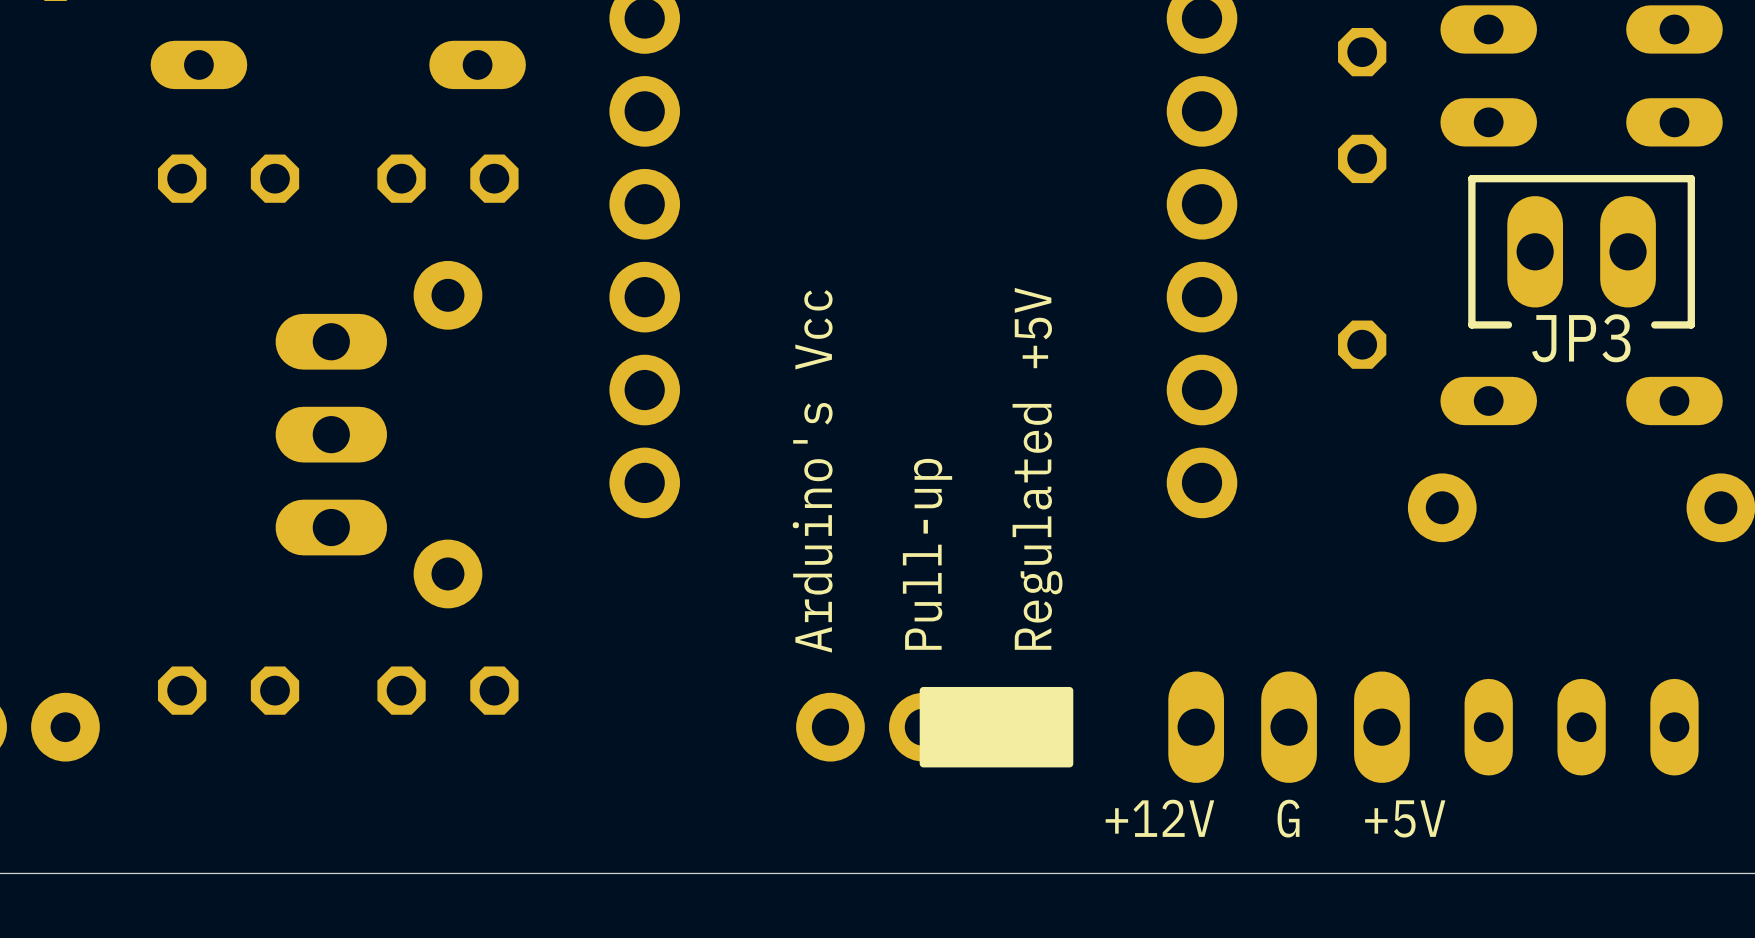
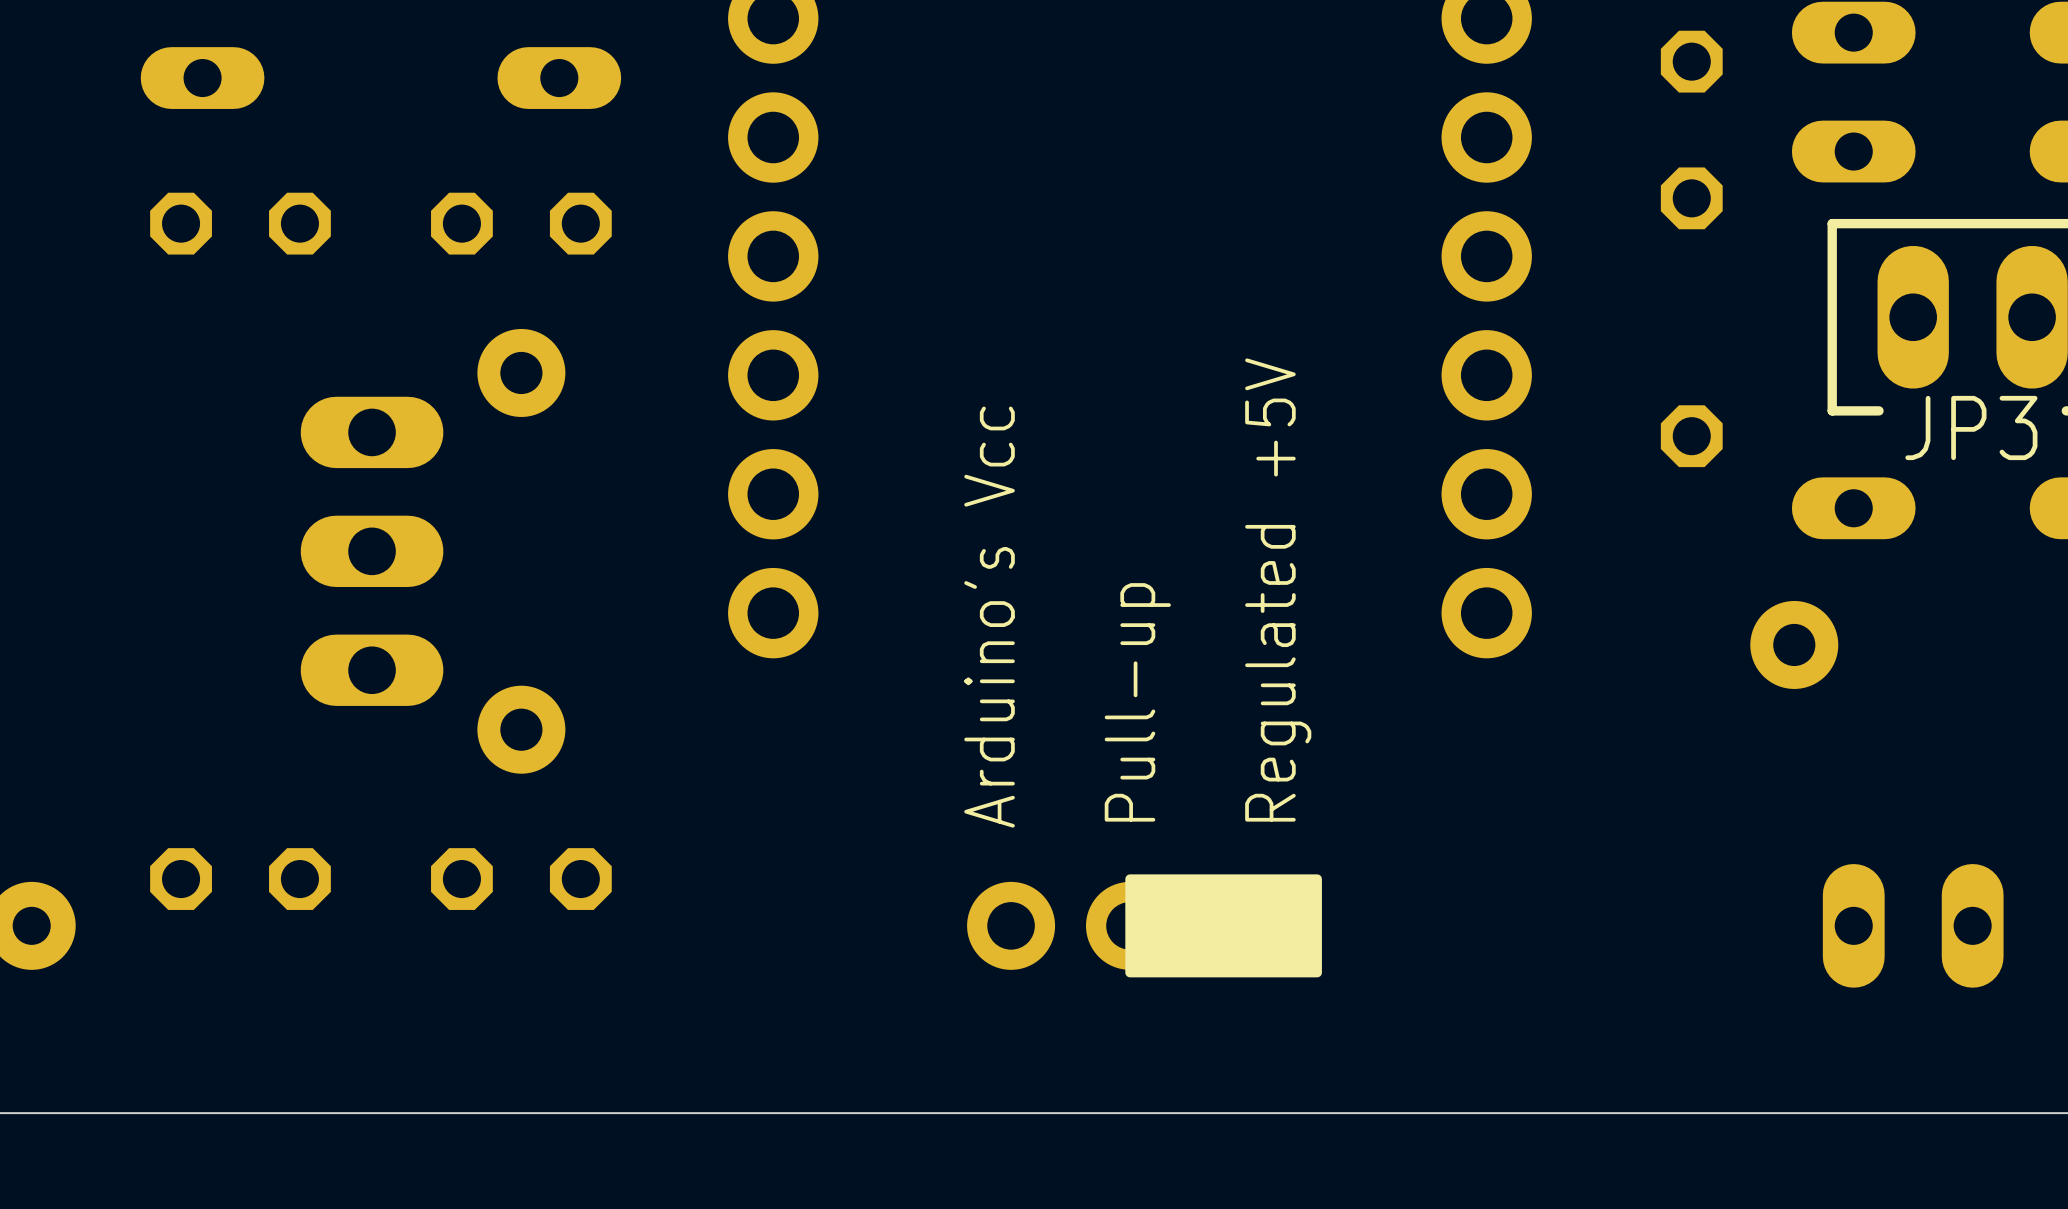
part: (1289, 727) -> none
text: +12V (1159, 818) -> none
text: G (1288, 818) -> none
text: +5V (1405, 818) -> none

